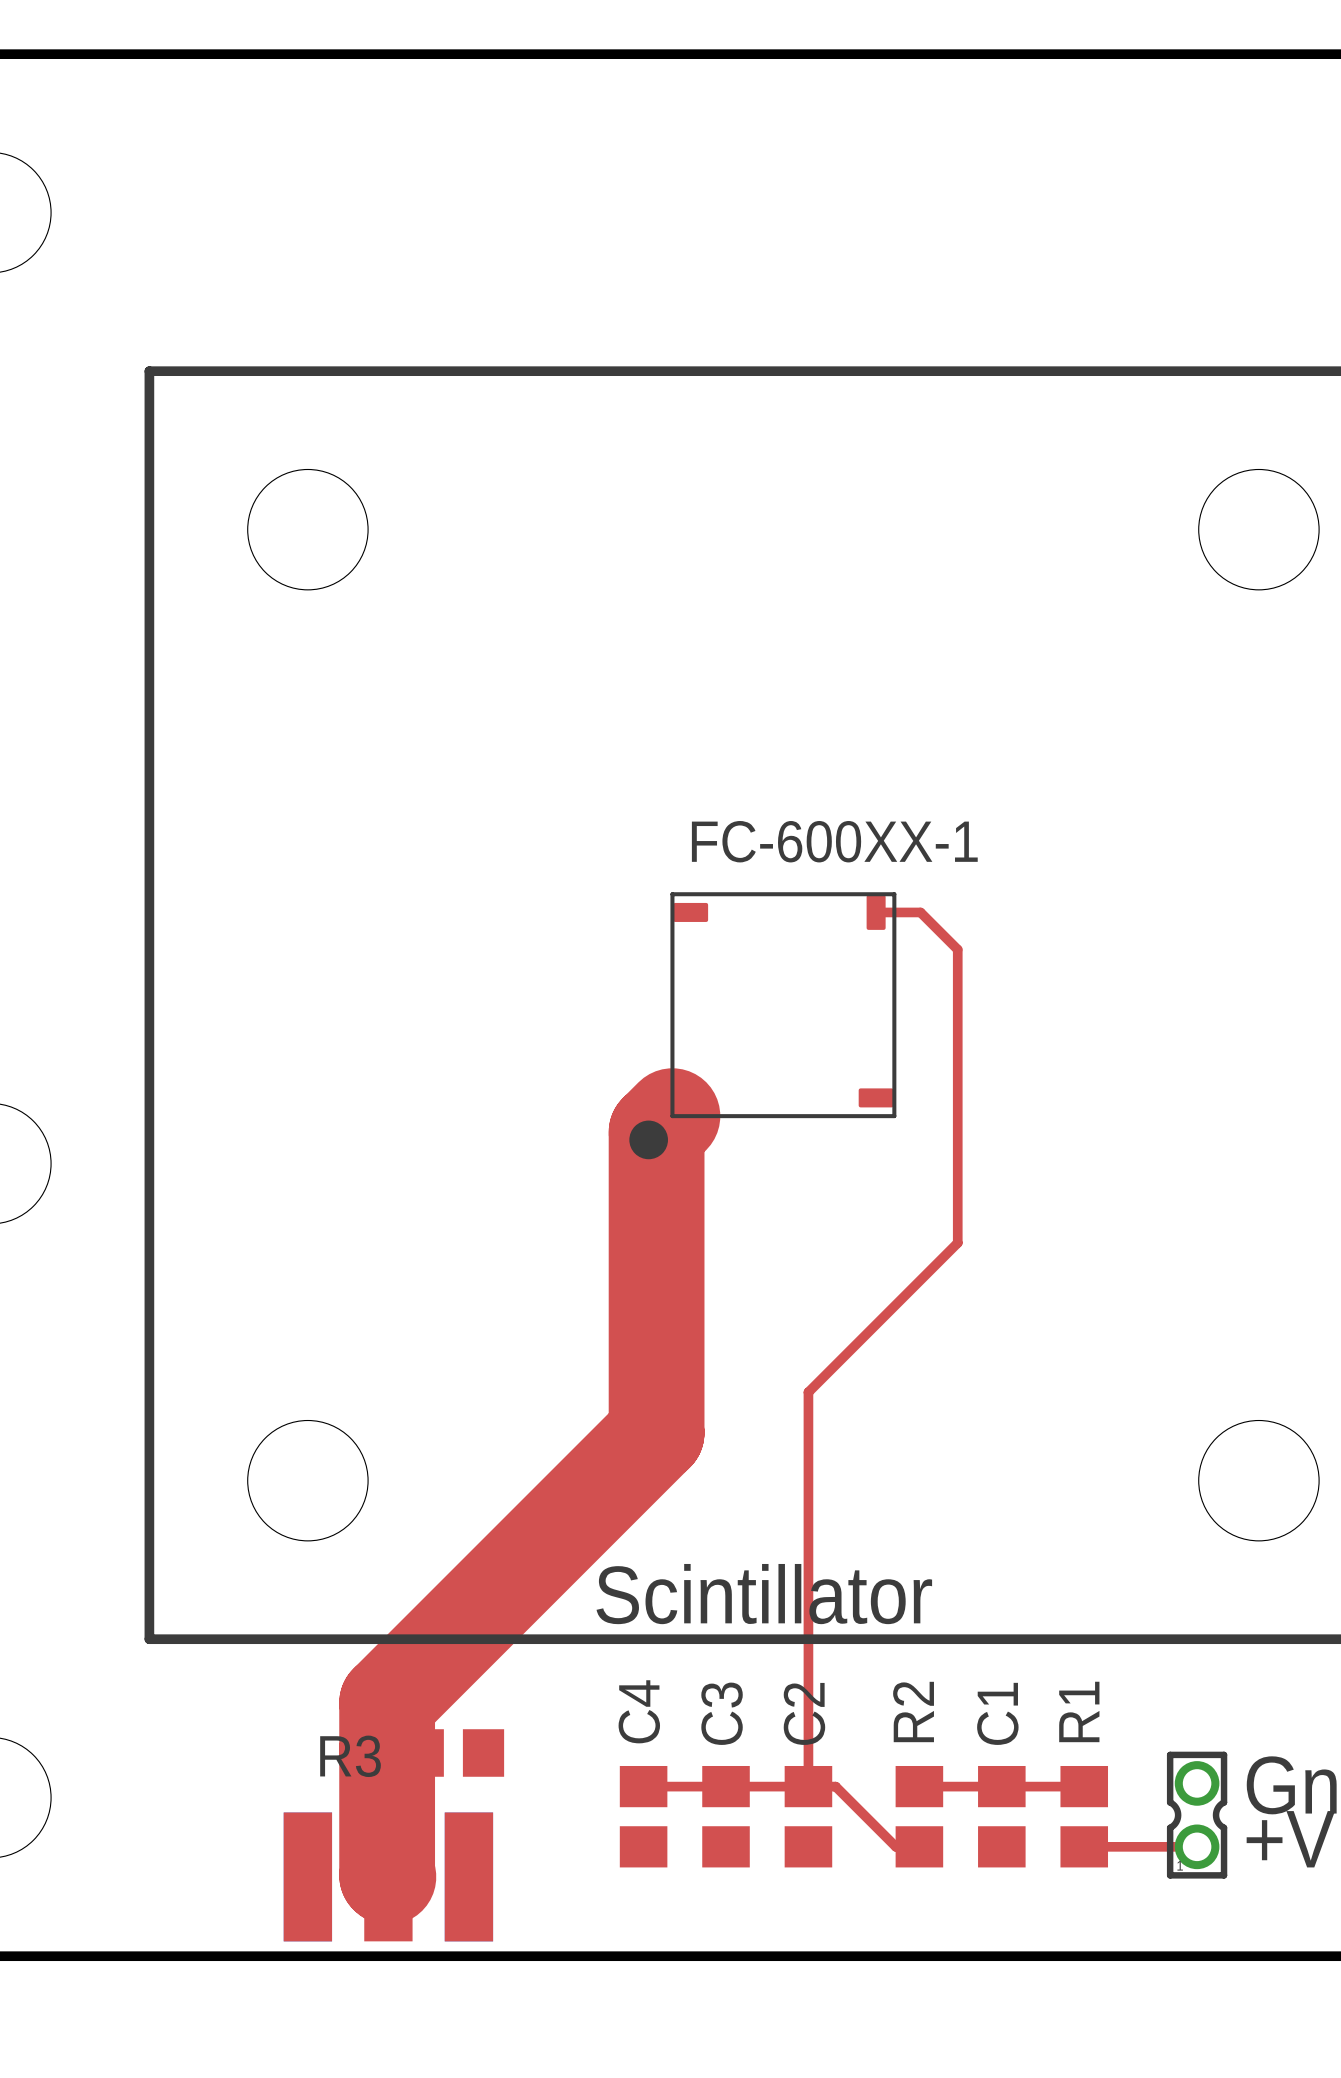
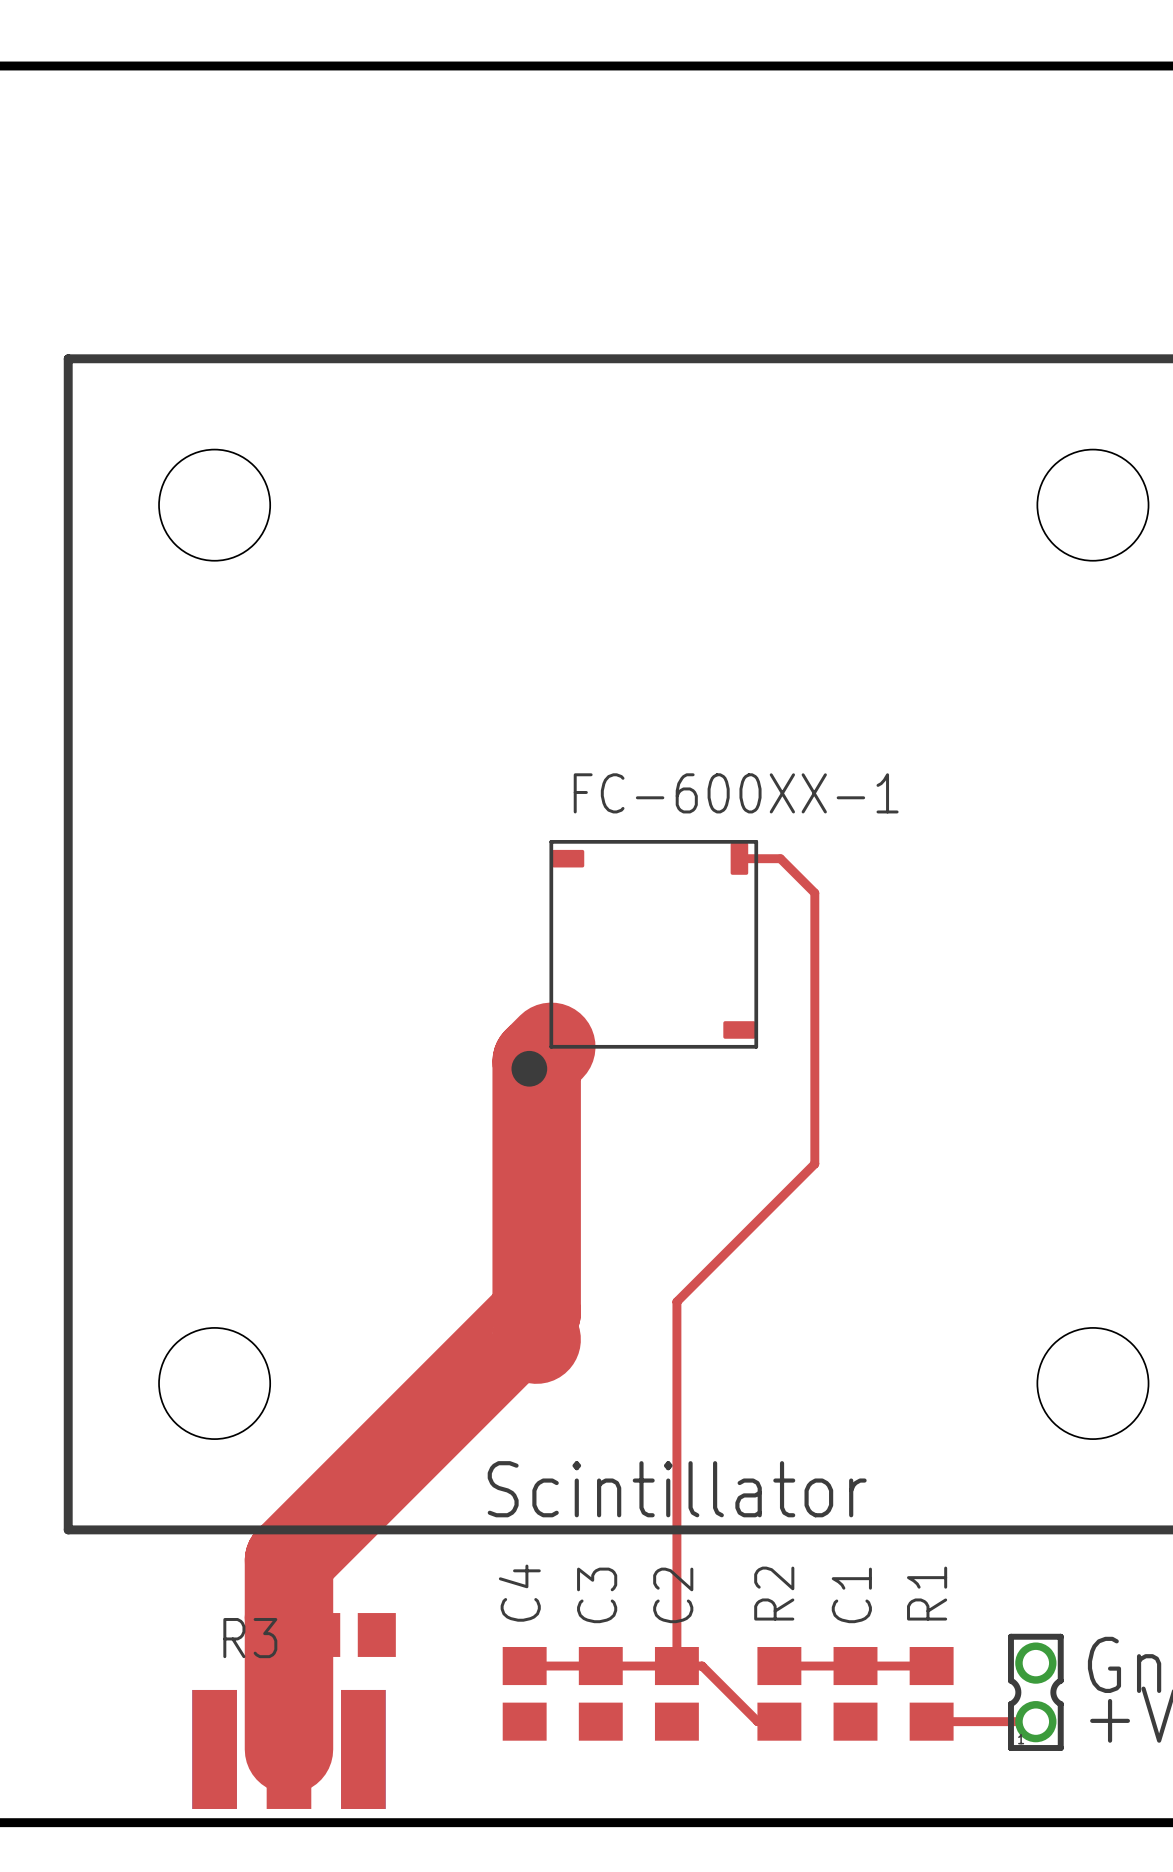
top track: (656, 1403) (656, 1433) (387, 1702) (388, 1876) -> (536, 1312) (288, 1560) (288, 1749)

